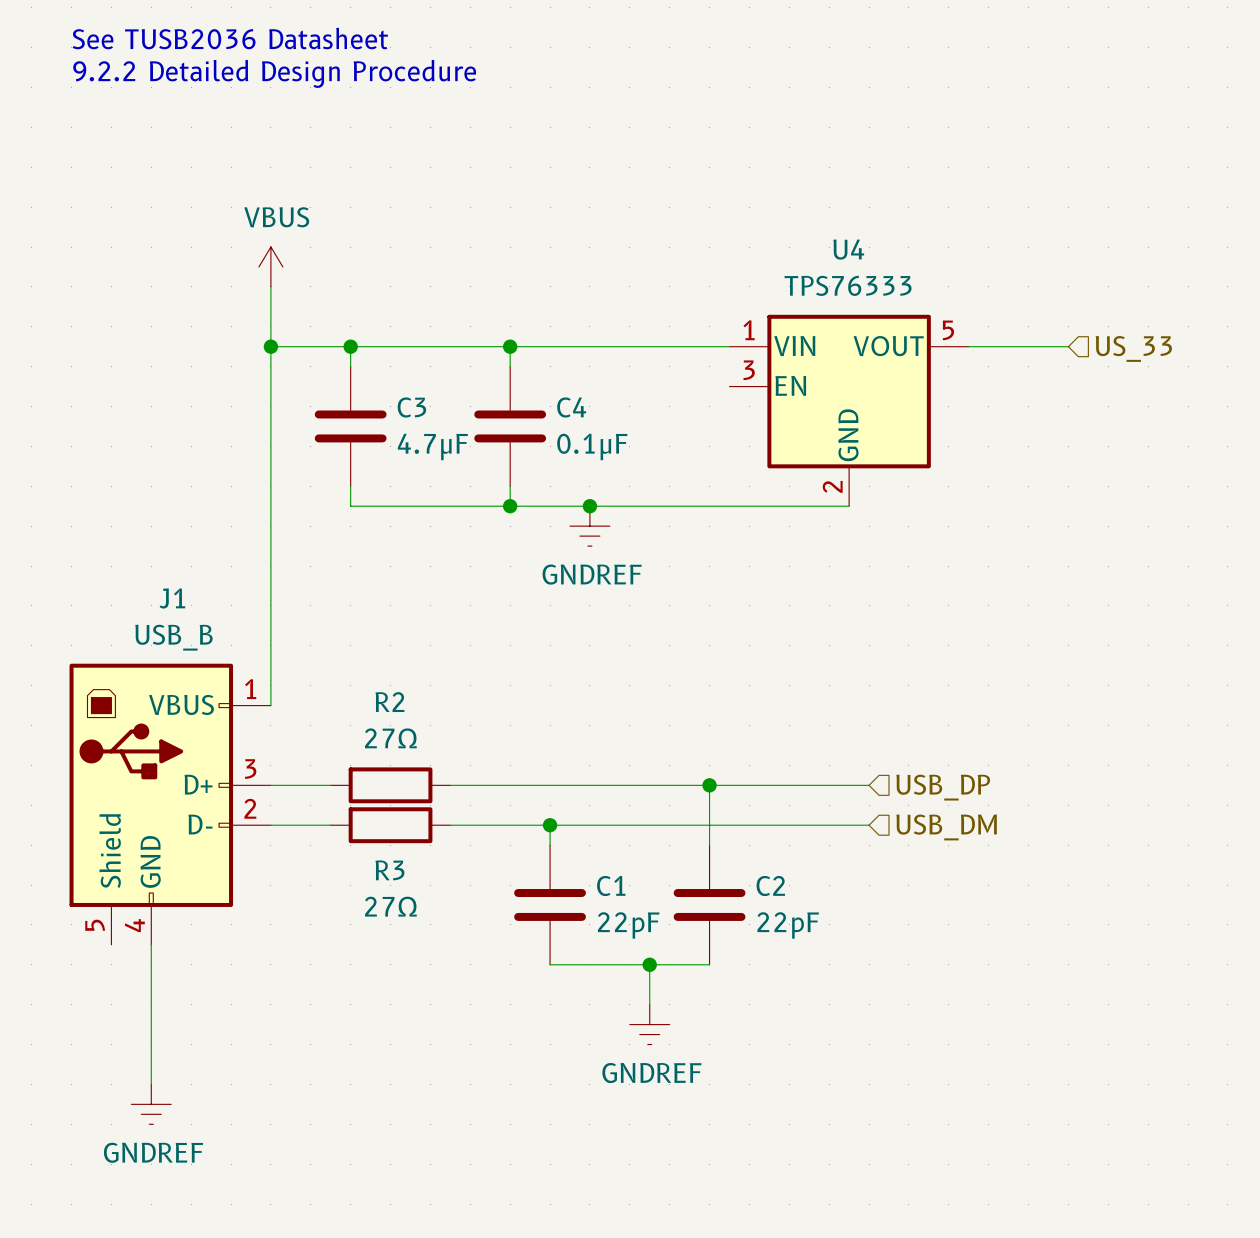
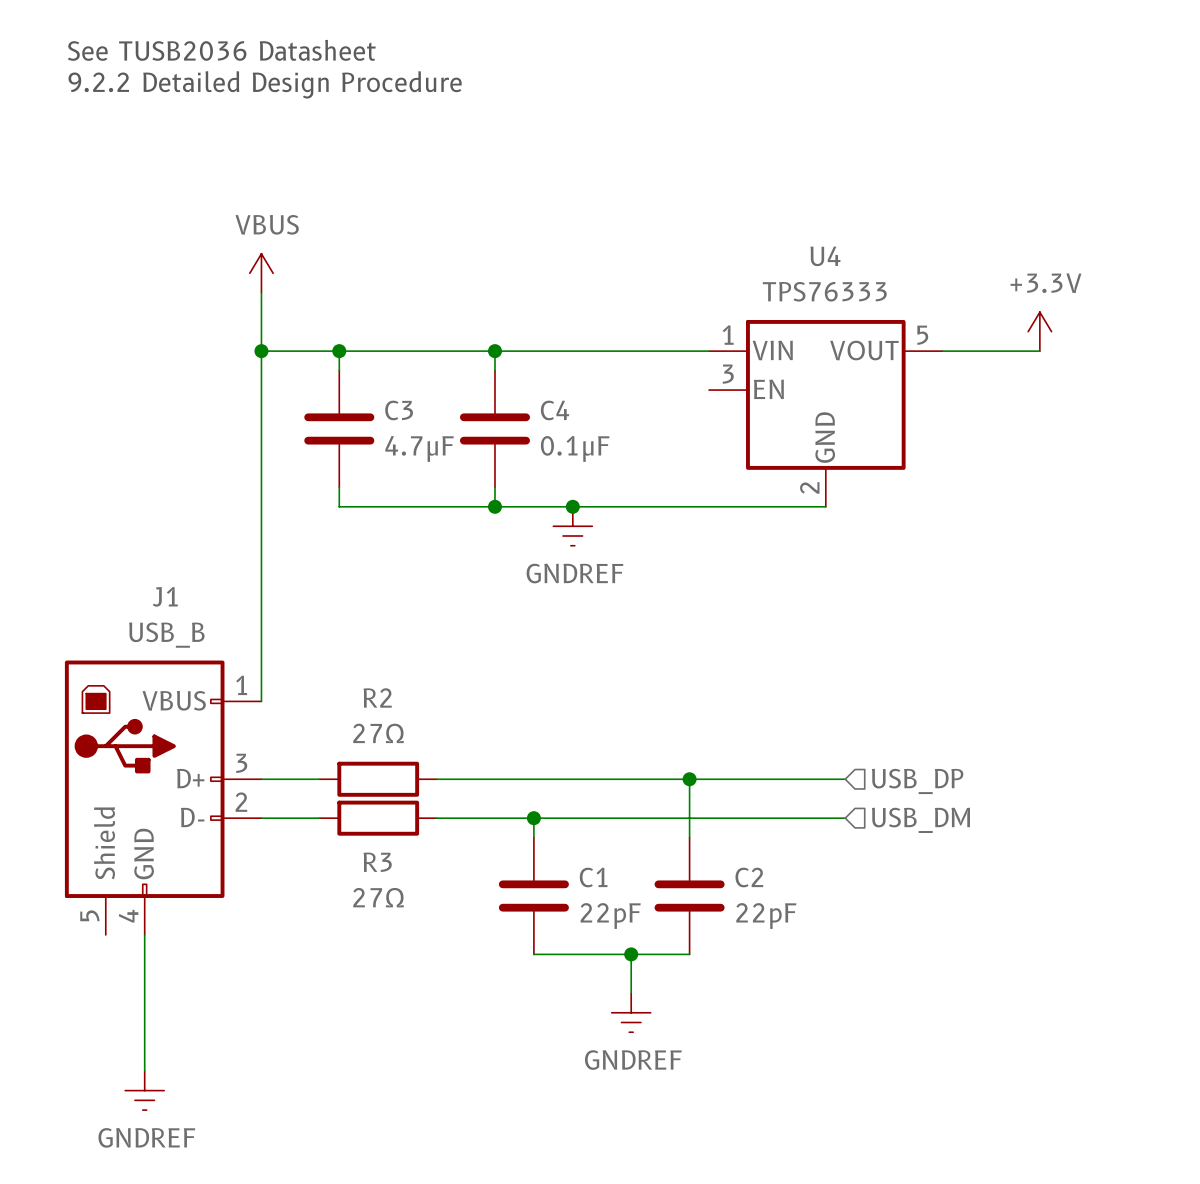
power symbol: none -> +3.3V (1039, 331)
hierarchical label: US_33 (1133, 348) -> none

